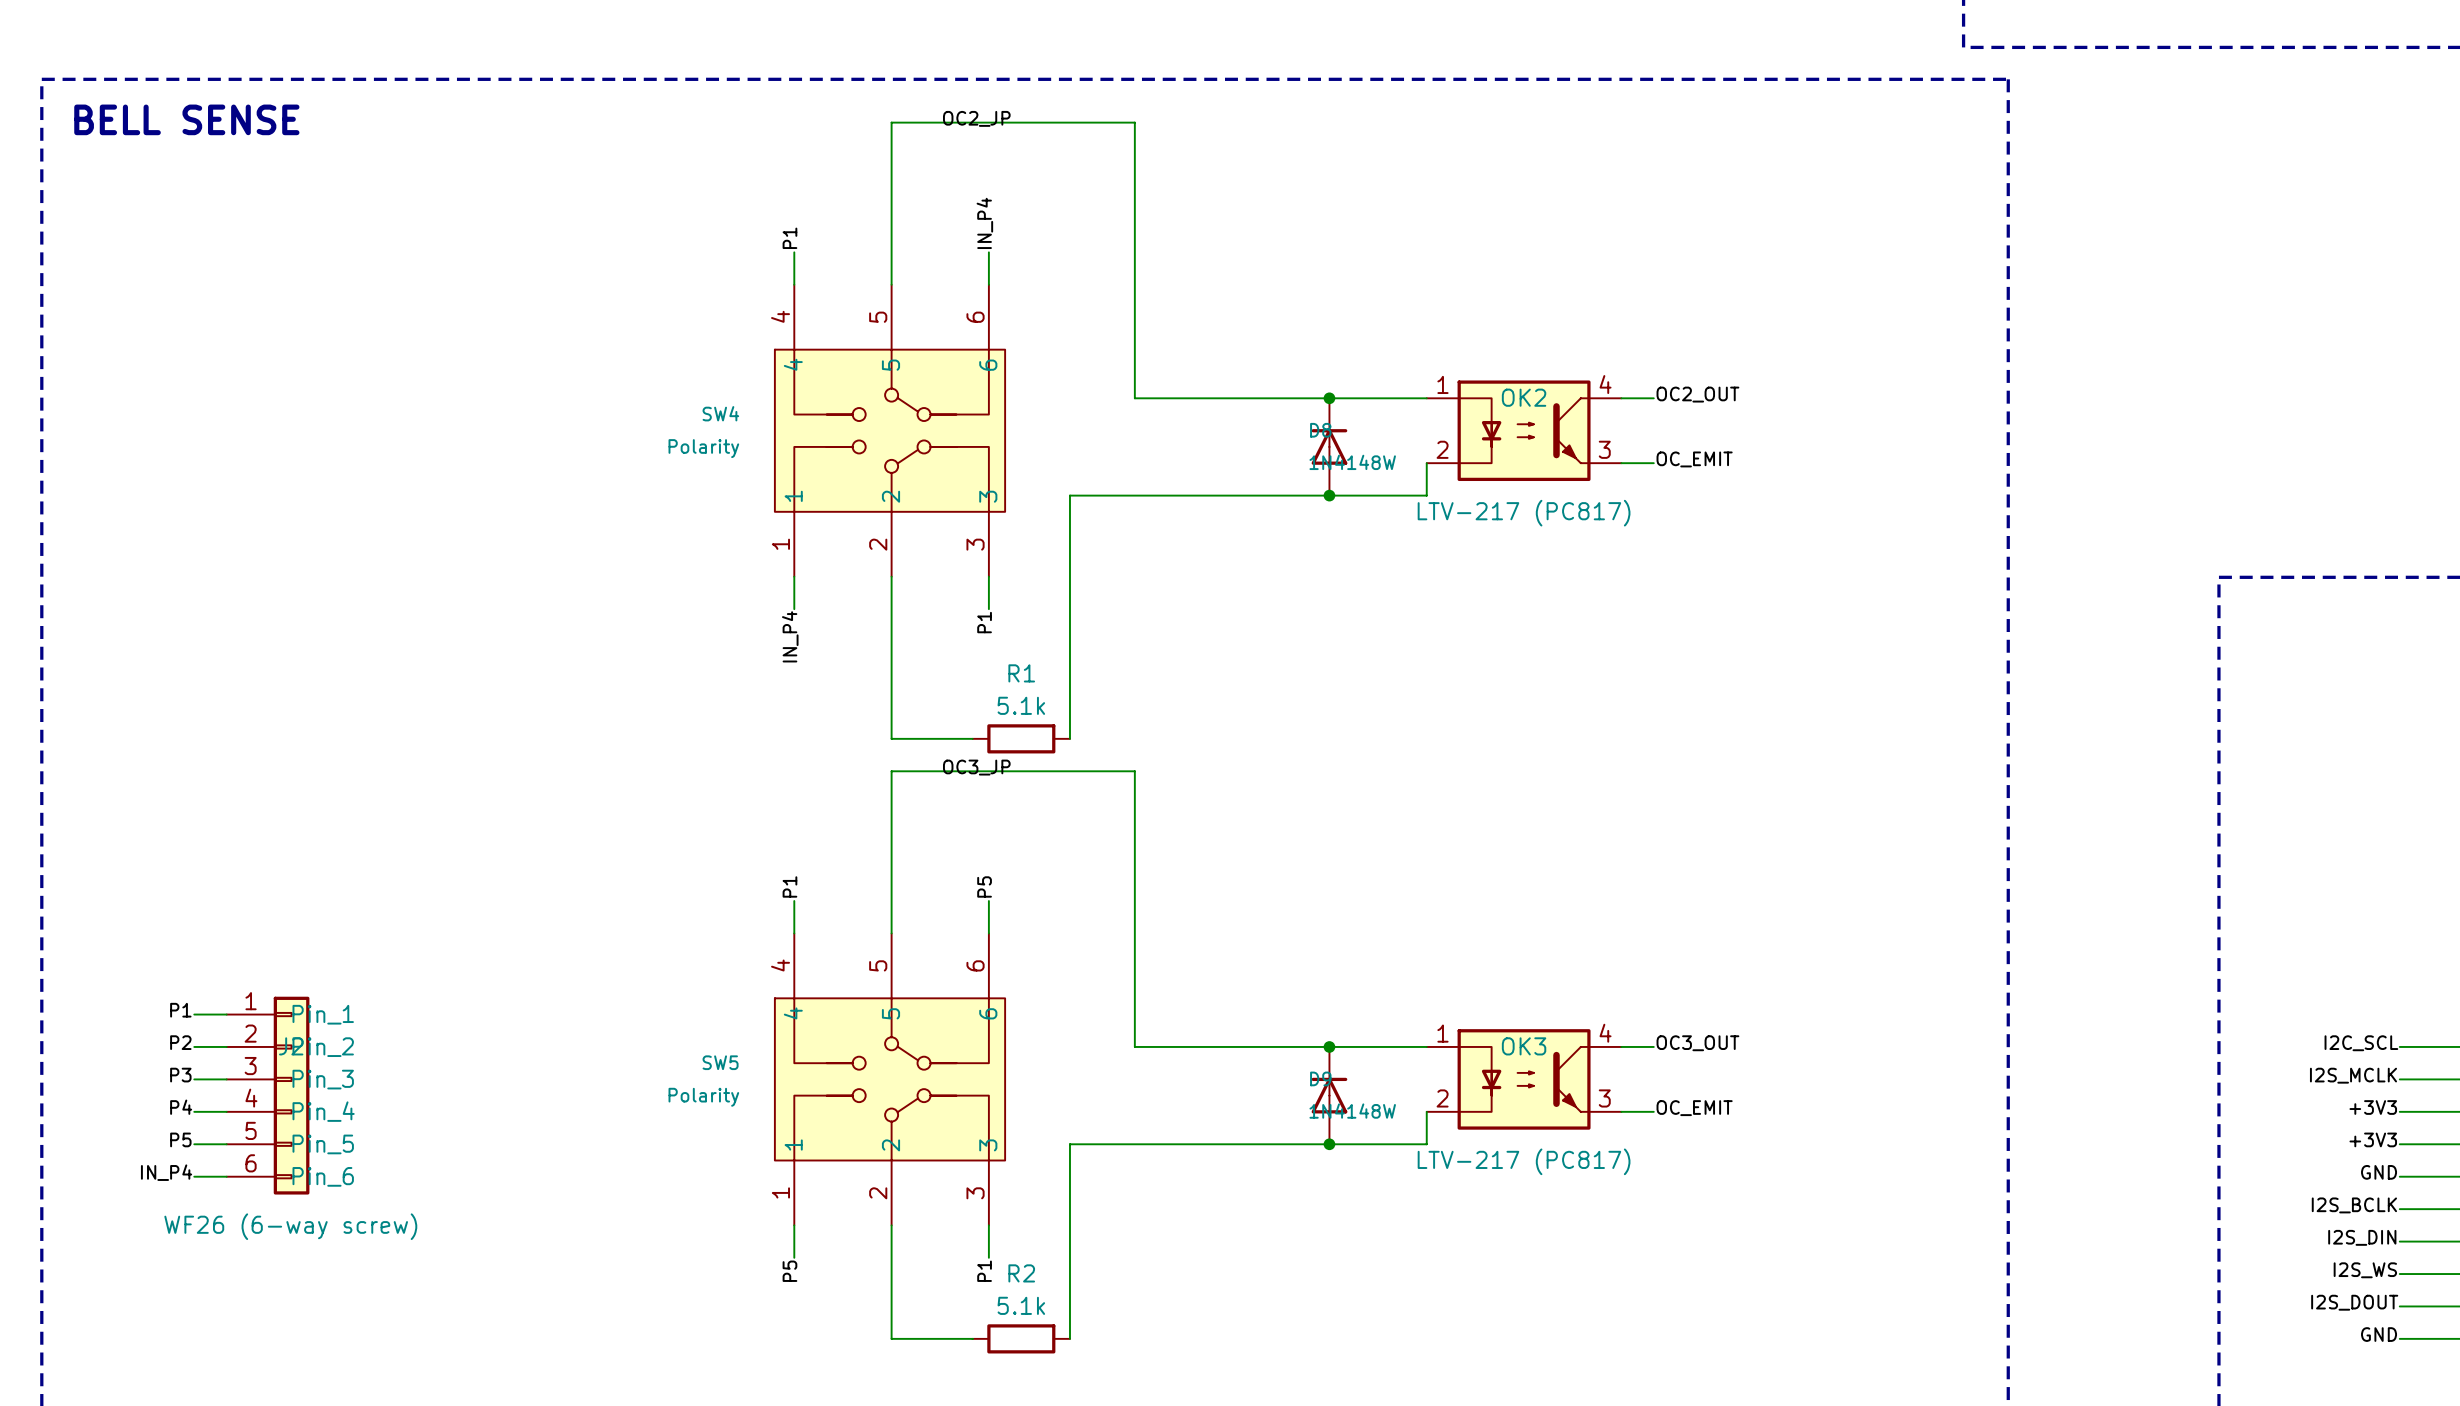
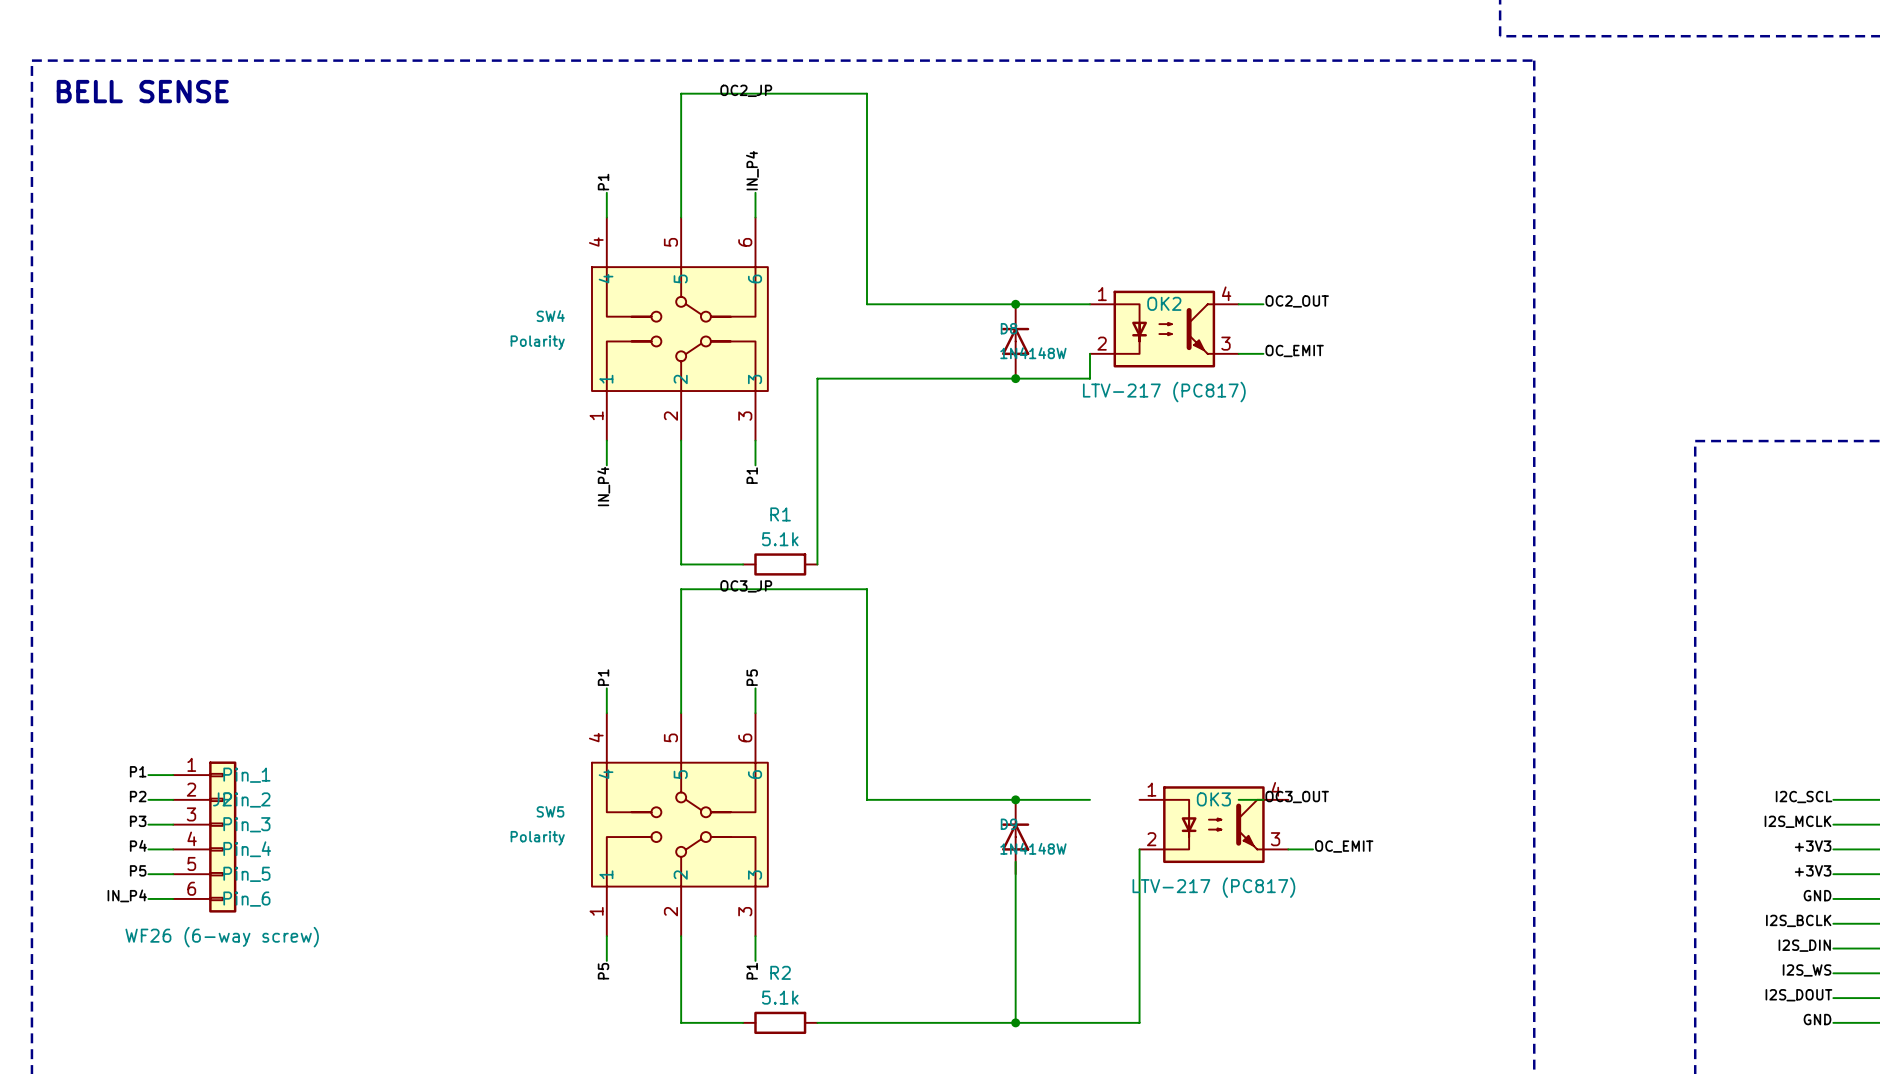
OK3 position: (1524, 1079) -> (1213, 824)
label position: OC_EMIT (1694, 1108) -> OC_EMIT (1344, 846)
wire: (1426, 1111) (1426, 1144) (1069, 1144) (1069, 1338) -> (1139, 849) (1139, 1022) (817, 1022)
wire: none -> (1015, 861) (1015, 1022)
junction: (1329, 1144) -> none
junction: none -> (1015, 1022)

